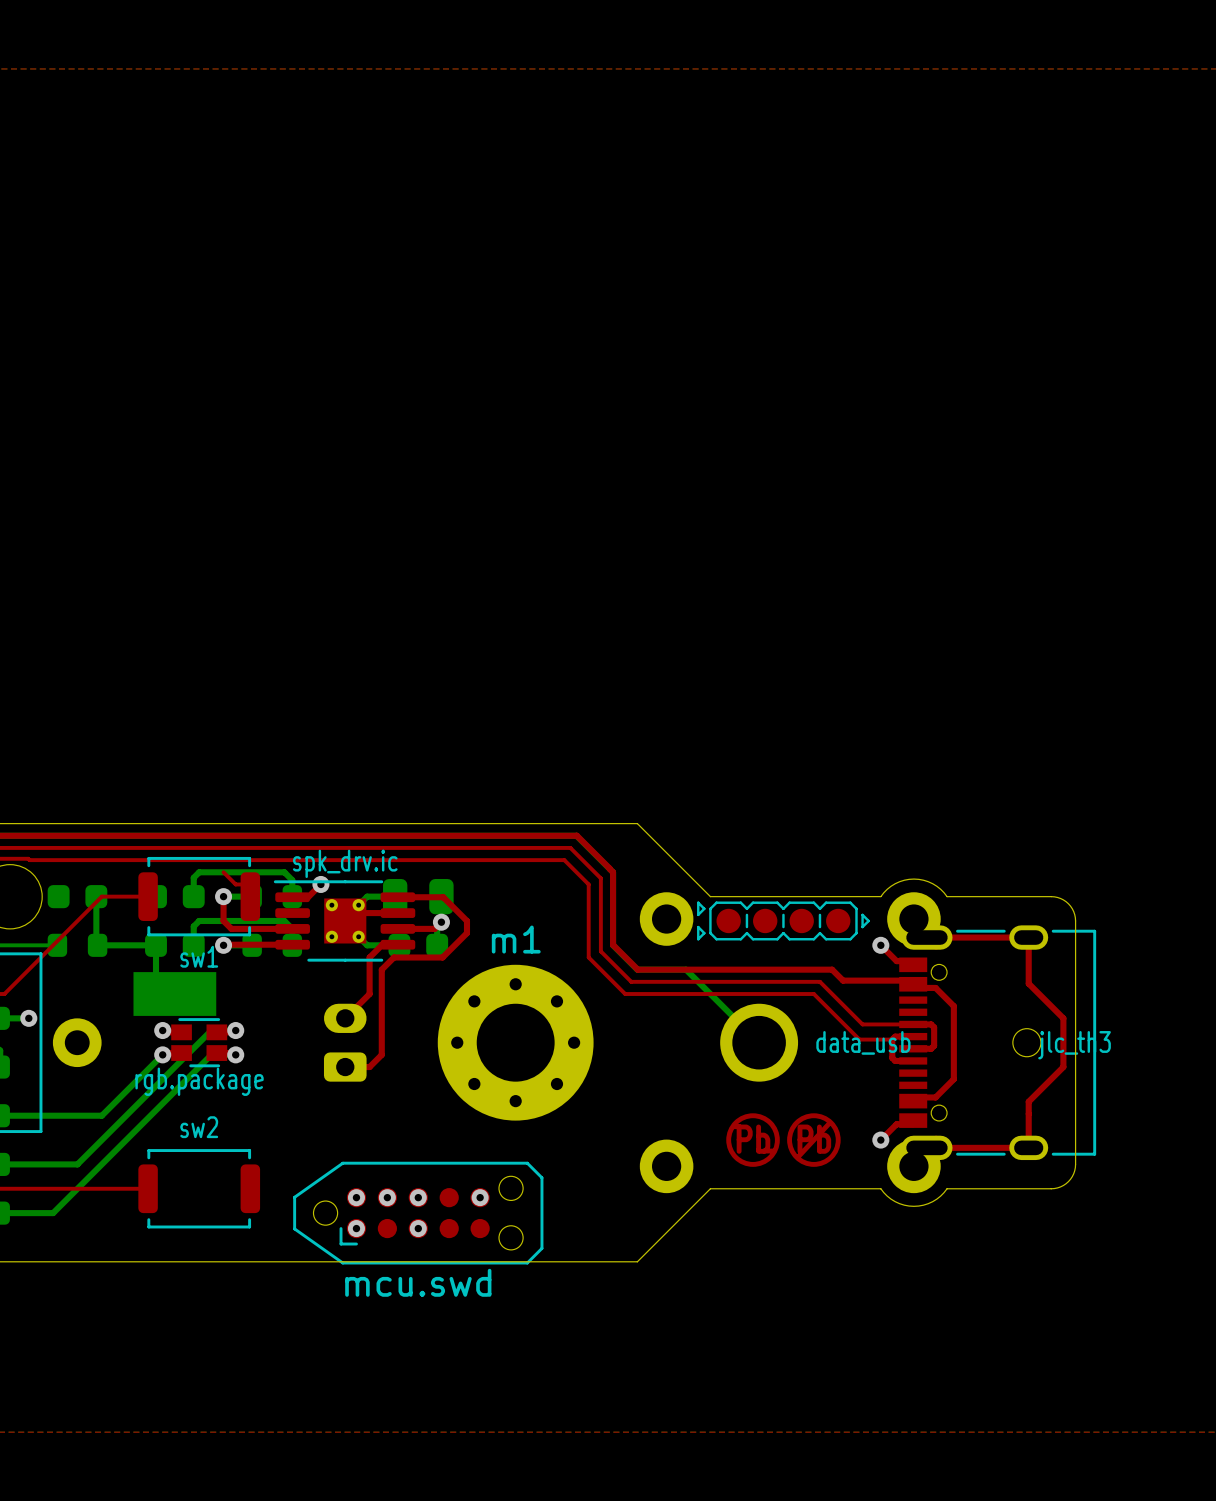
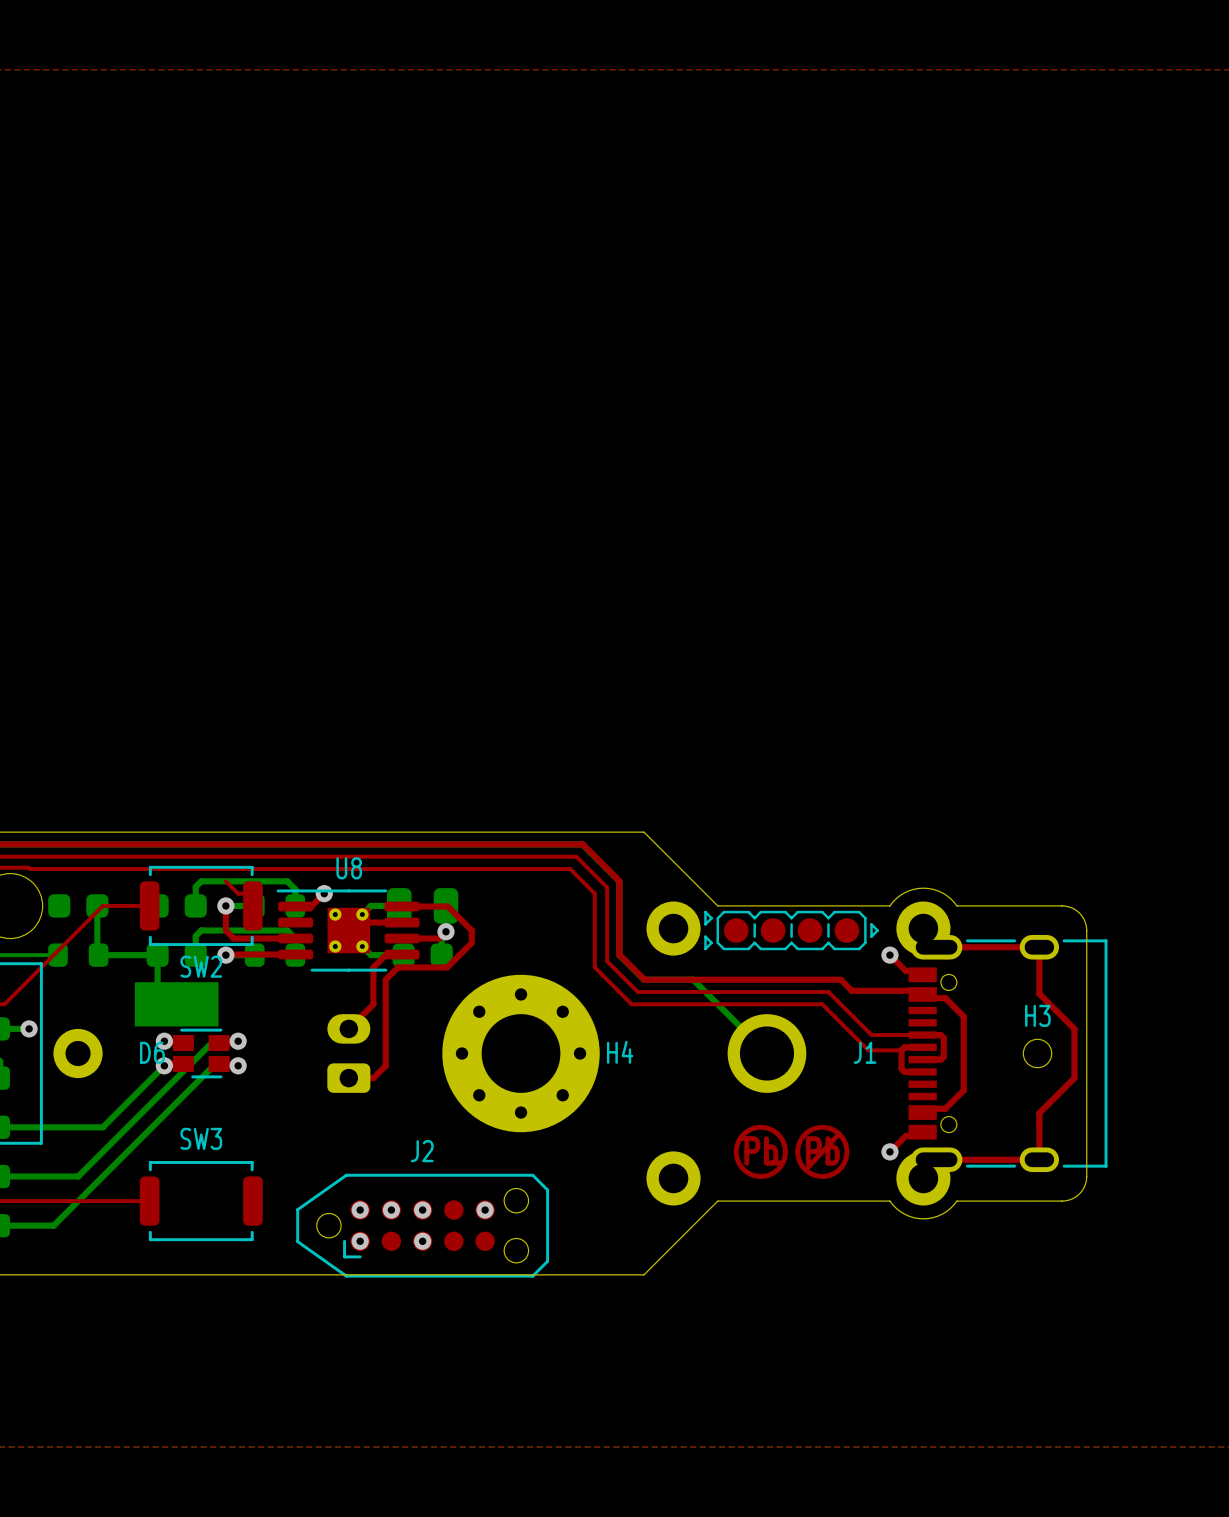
spk_drv.ic name: spk_drv.ic (345, 863) -> U8 (349, 868)
m1 name: m1 (516, 939) -> H4 (620, 1052)
sw1 name: sw1 (199, 956) -> SW2 (201, 966)
data_usb name: data_usb (863, 1042) -> J1 (865, 1052)
jlc_th3 name: jlc_th3 (1074, 1045) -> H3 (1037, 1015)
rgb.package name: rgb.package (199, 1081) -> D6 (152, 1052)
sw2 name: sw2 (199, 1127) -> SW3 (201, 1138)
mcu.swd name: mcu.swd (418, 1282) -> J2 (422, 1151)

